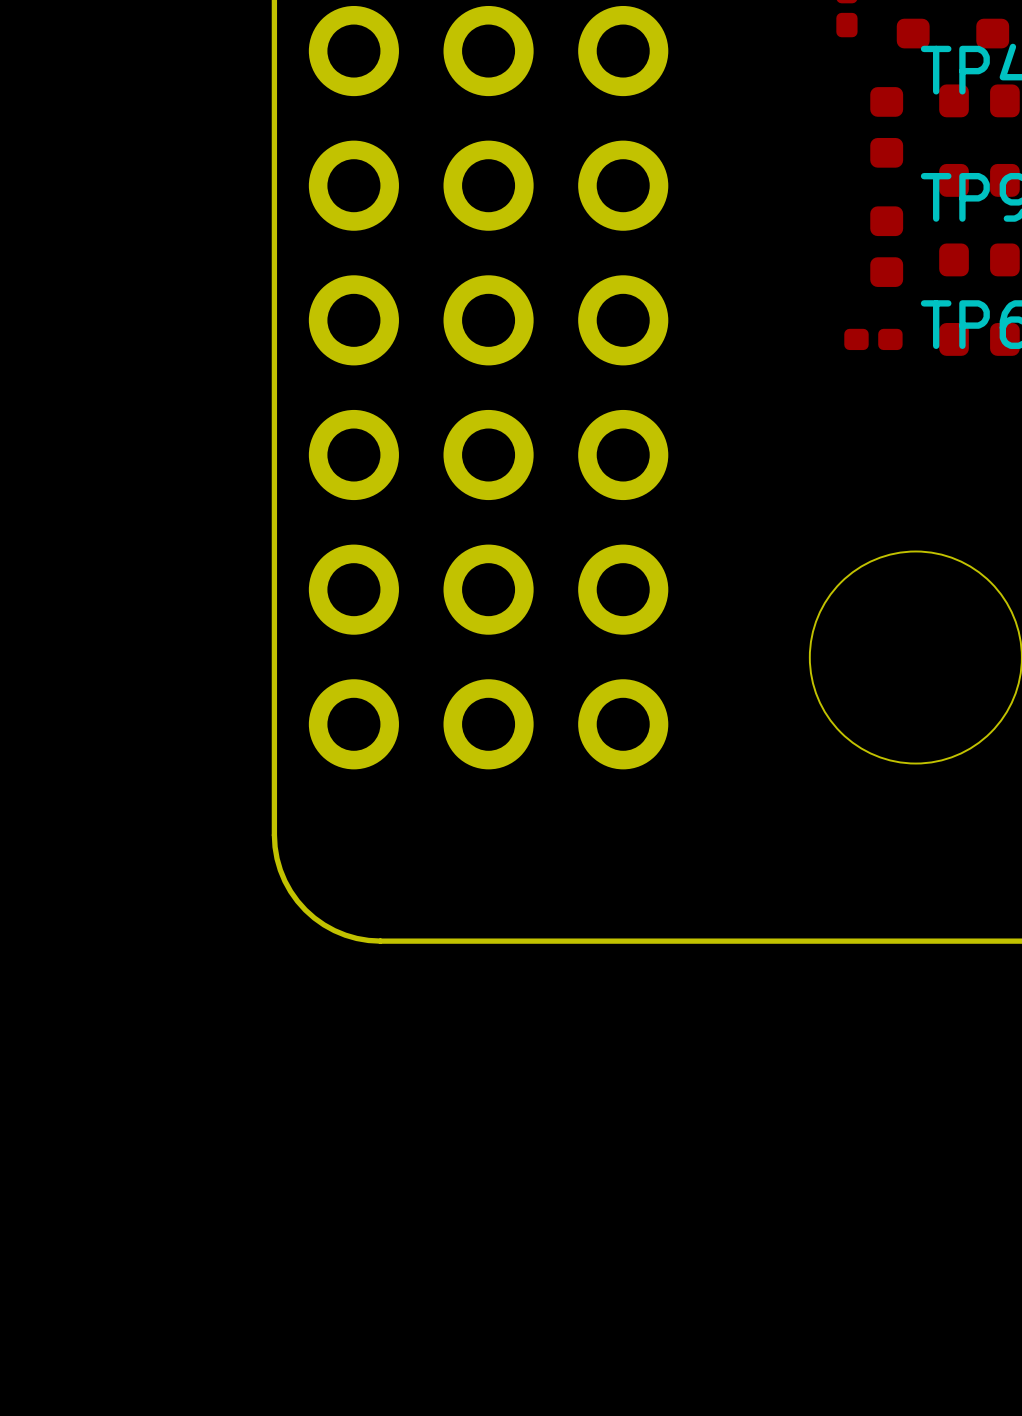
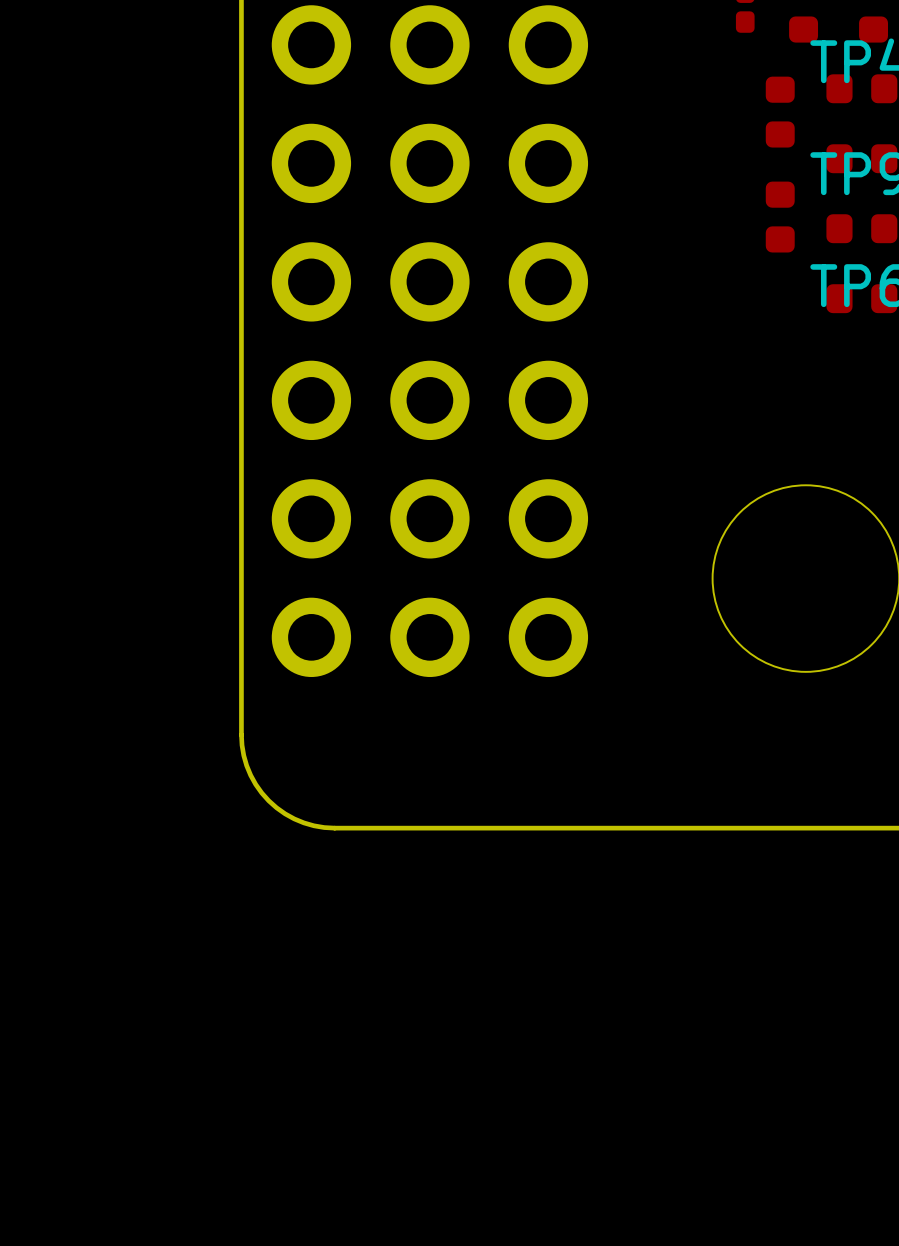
part: (873, 339) -> none

